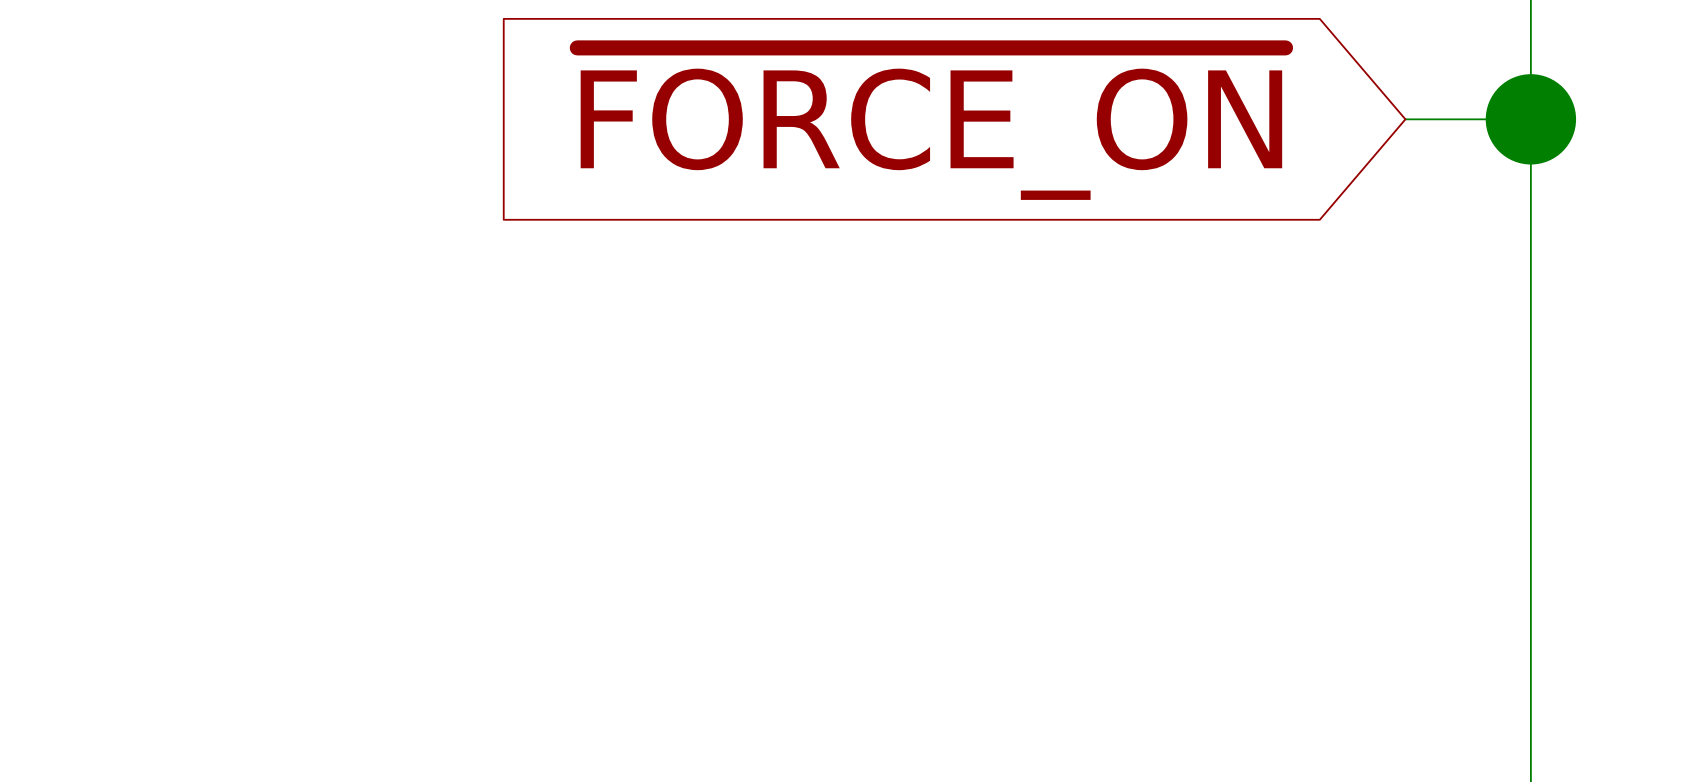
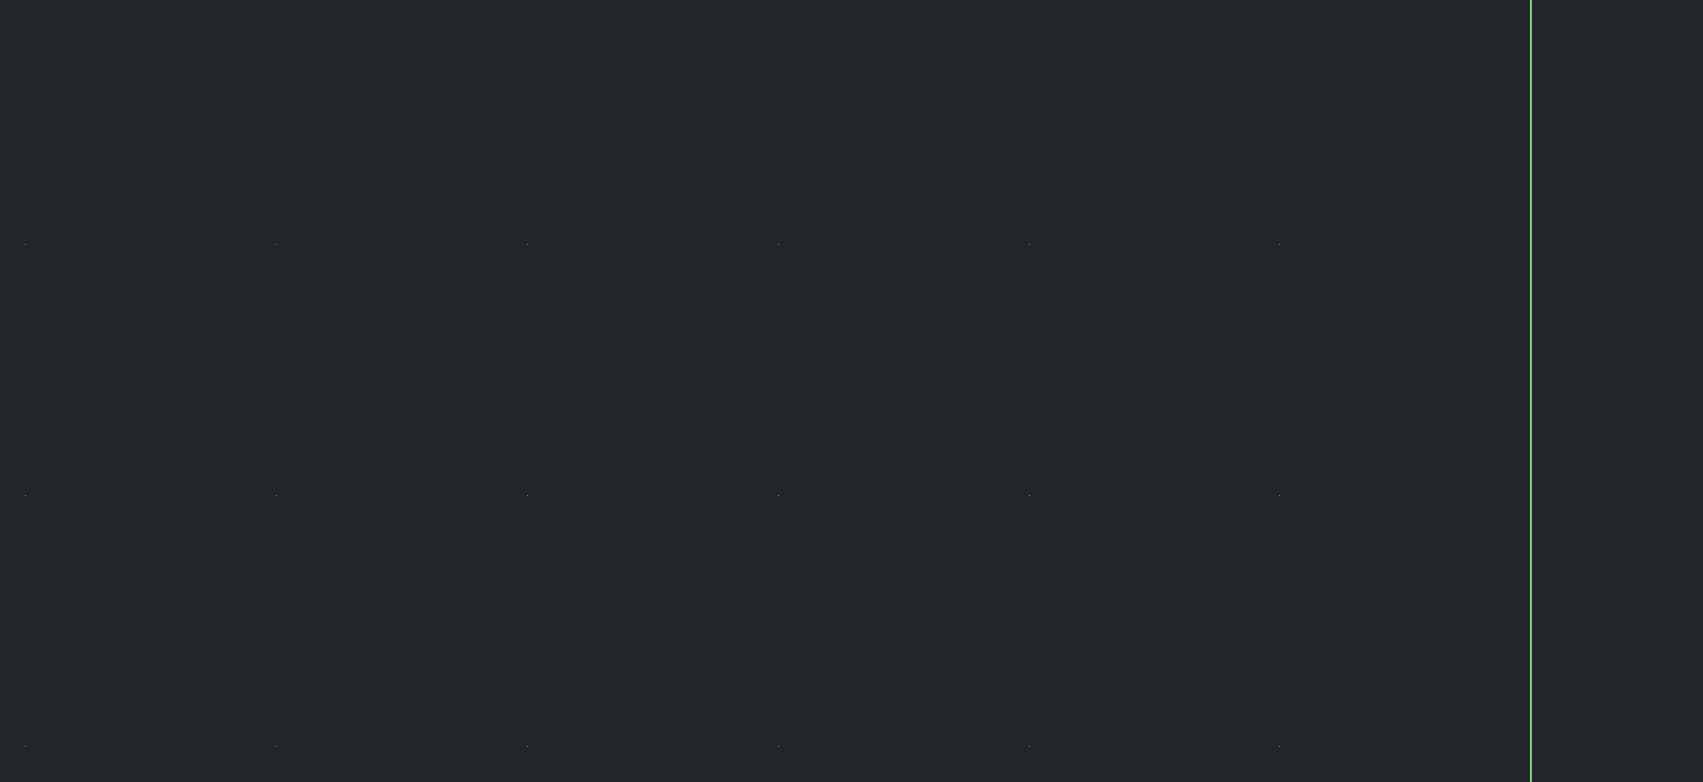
wire: (1405, 119) (1530, 119) -> none
junction: (1530, 119) -> none
global label: ~{FORCE_ON} (931, 123) -> none

